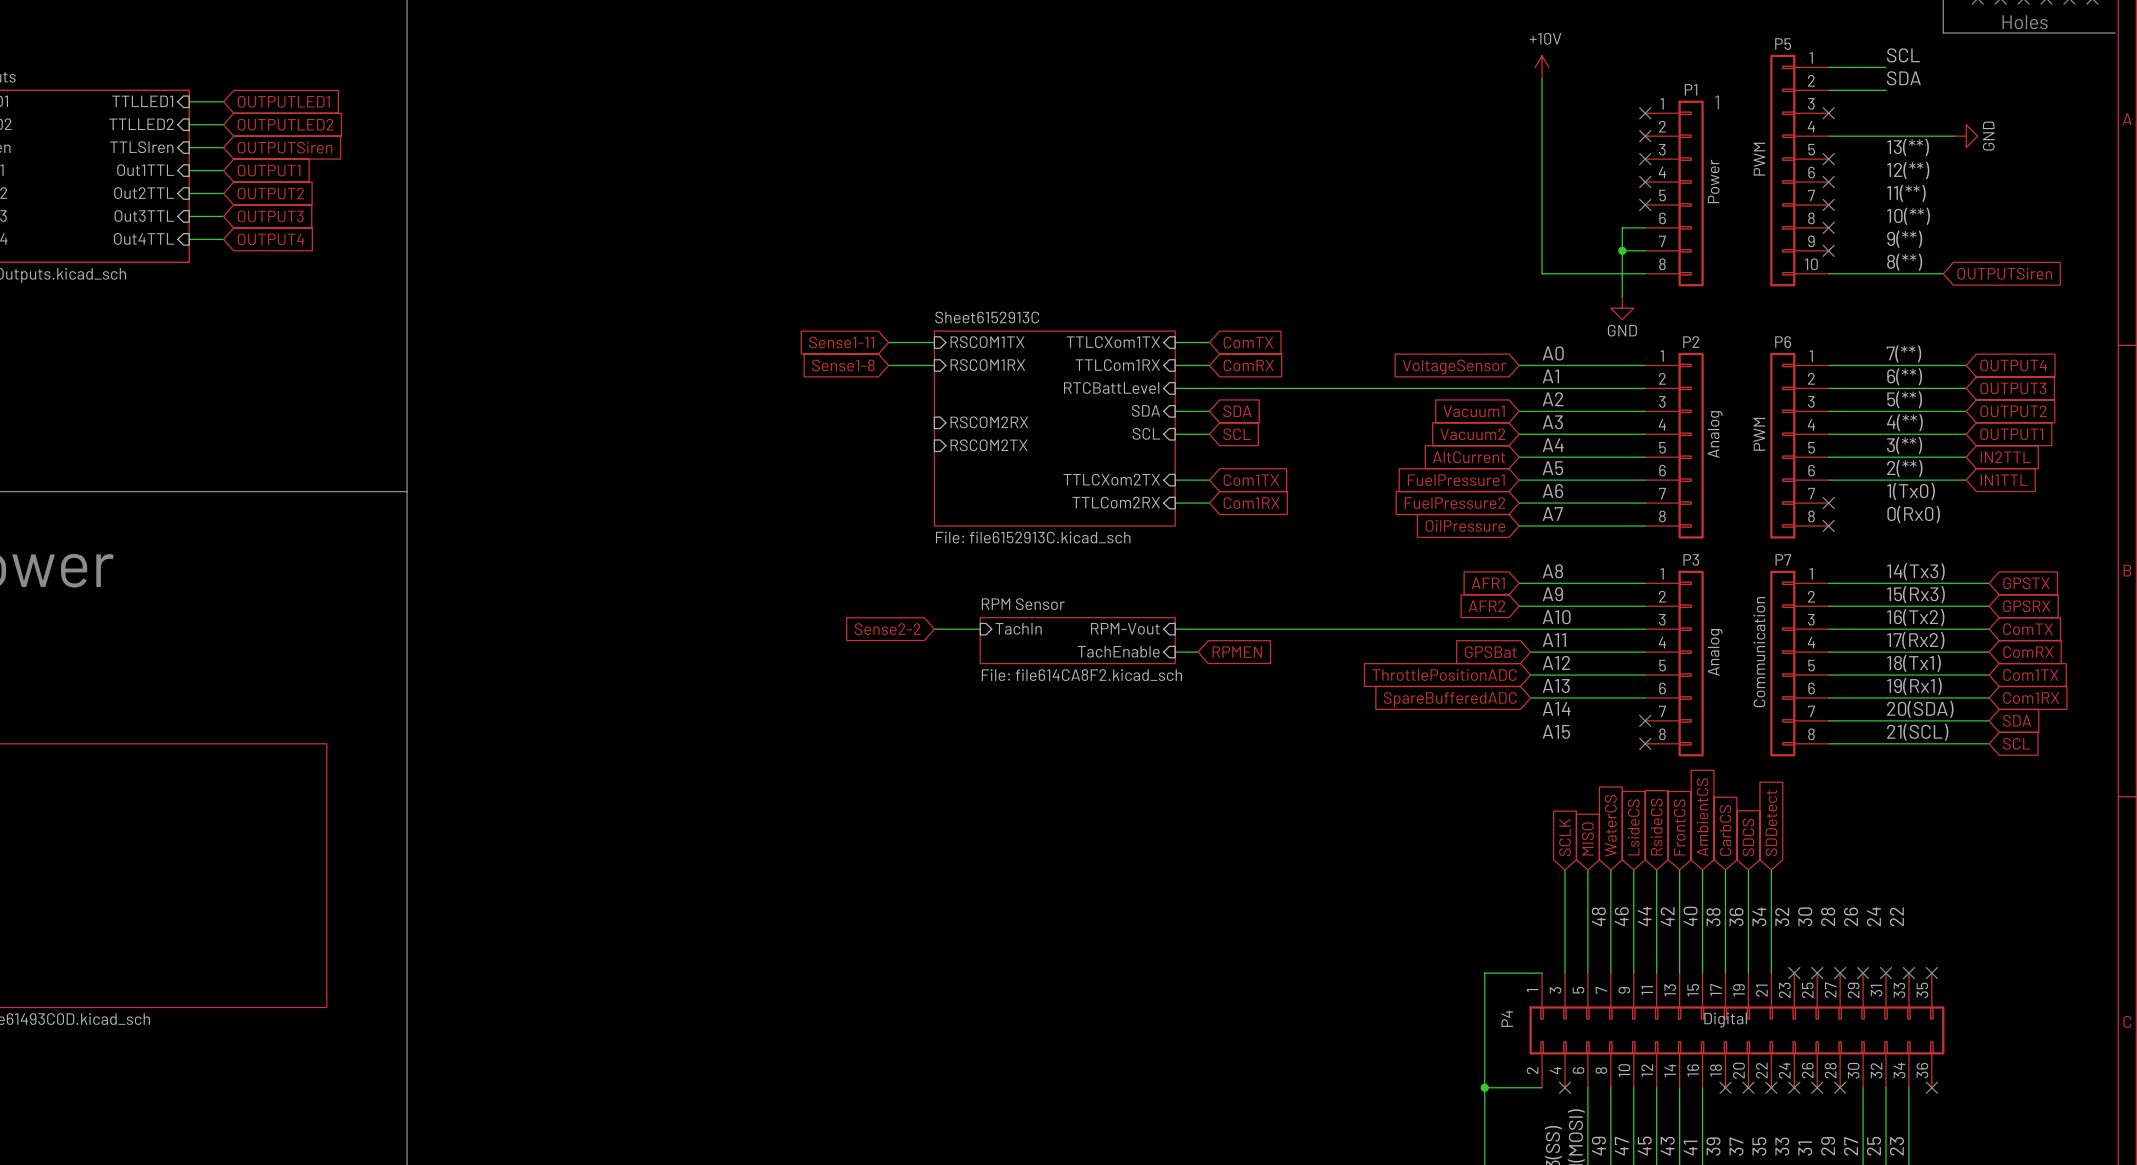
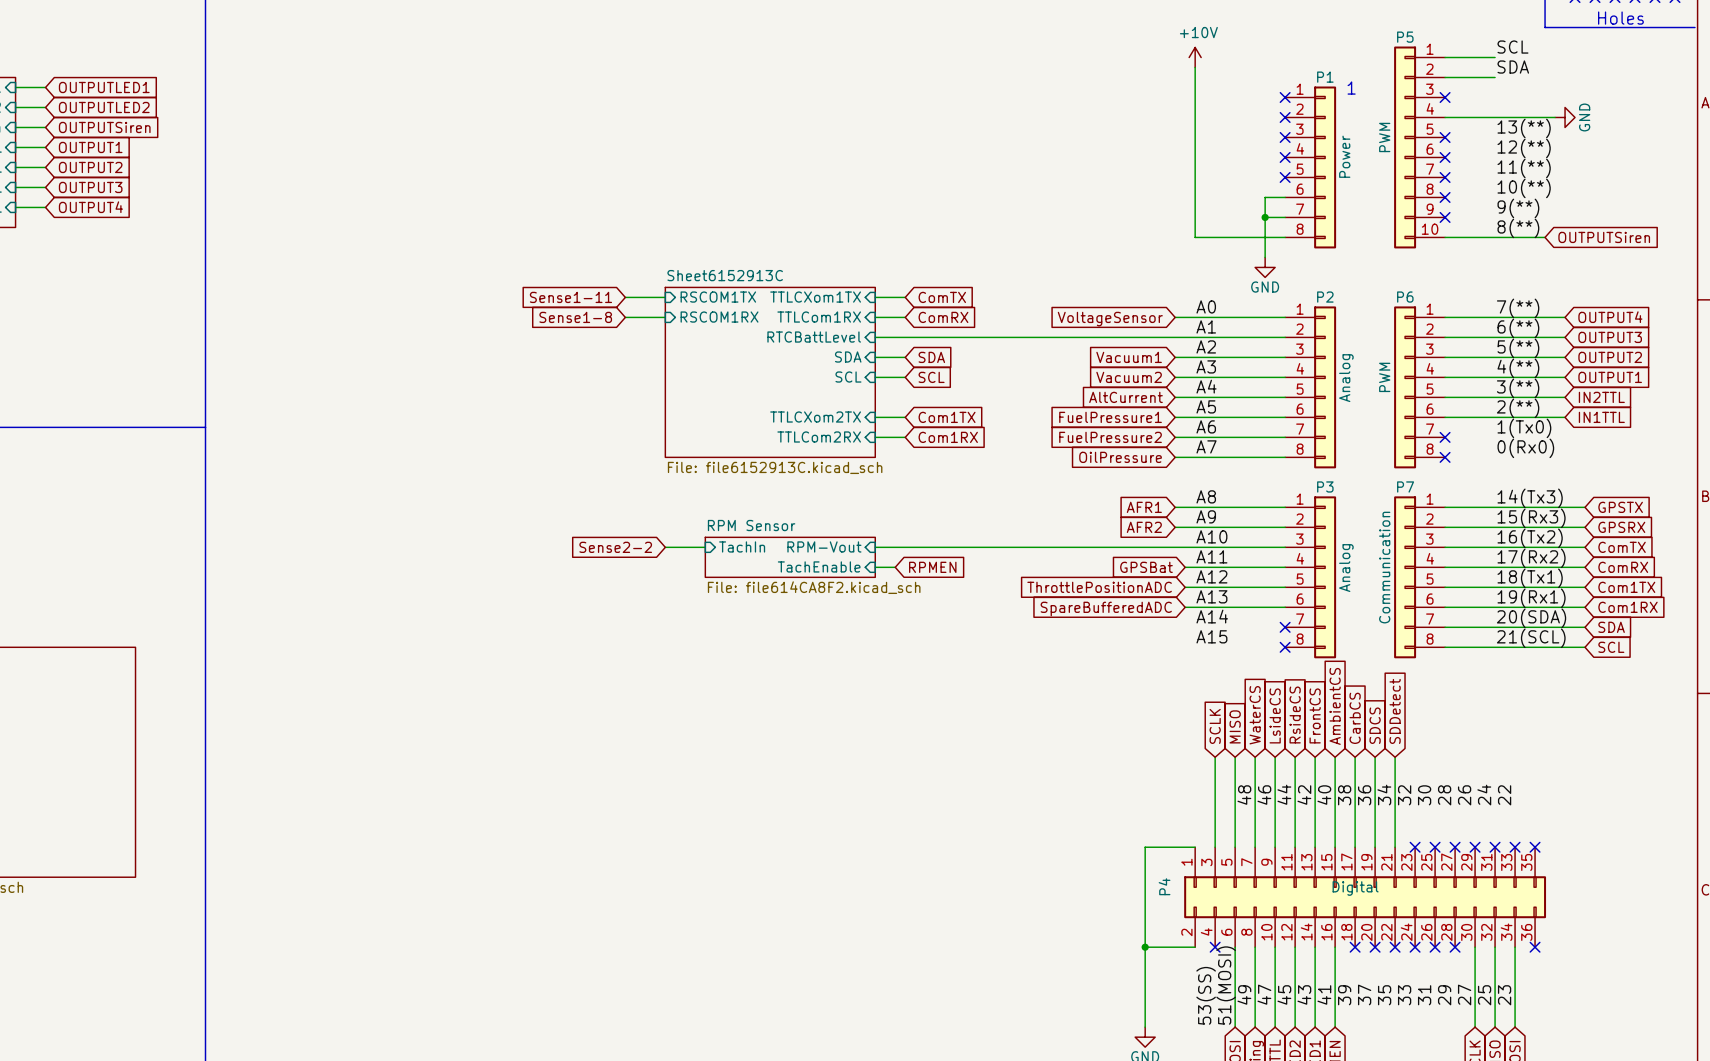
sheet pin: RSCOM2RX (989, 422) -> none
sheet pin: RSCOM2TX (989, 445) -> none

